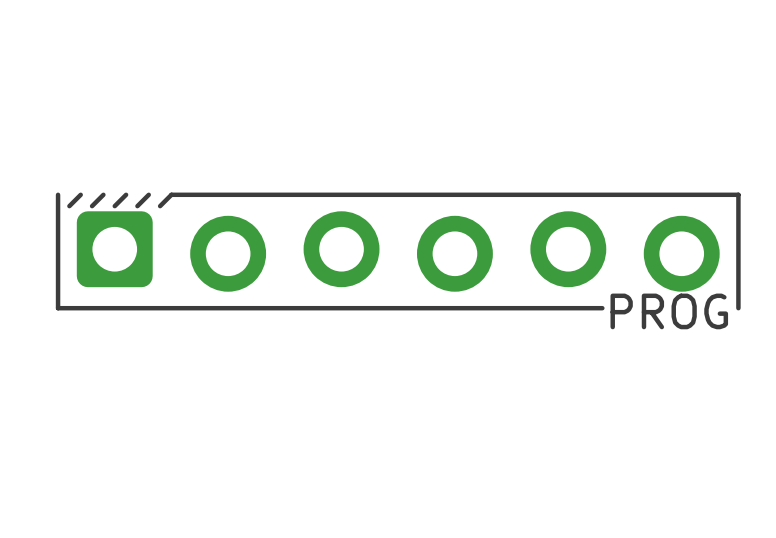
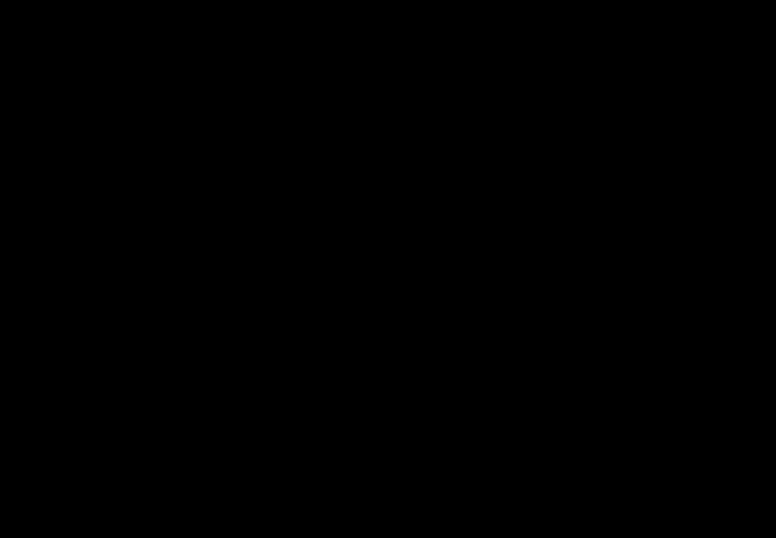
part: (398, 251) -> none

